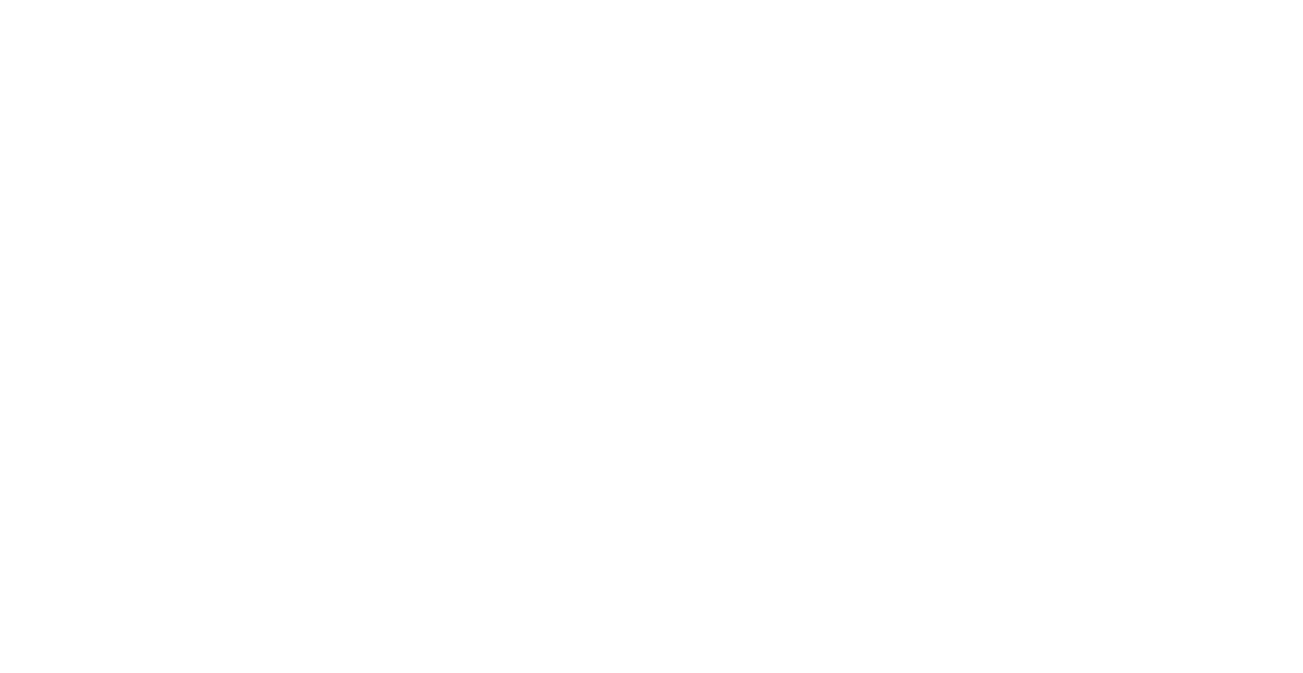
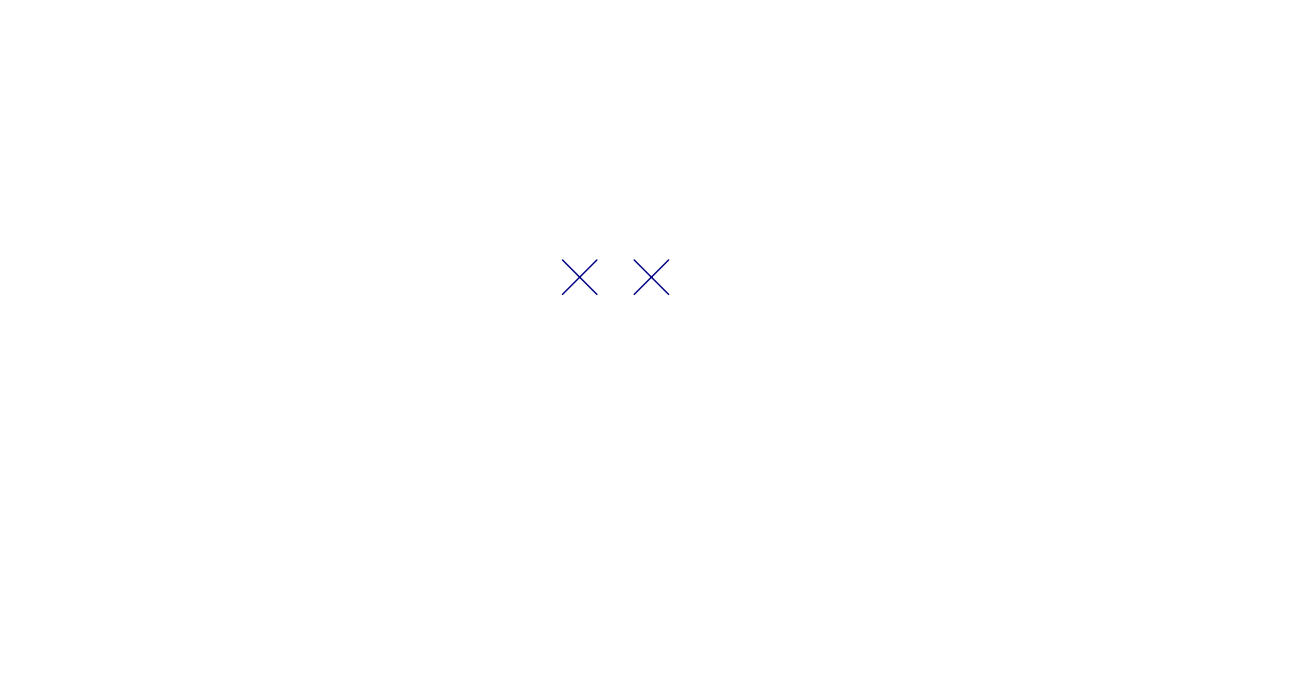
no-connect mark: none -> (579, 277)
no-connect mark: none -> (651, 277)

